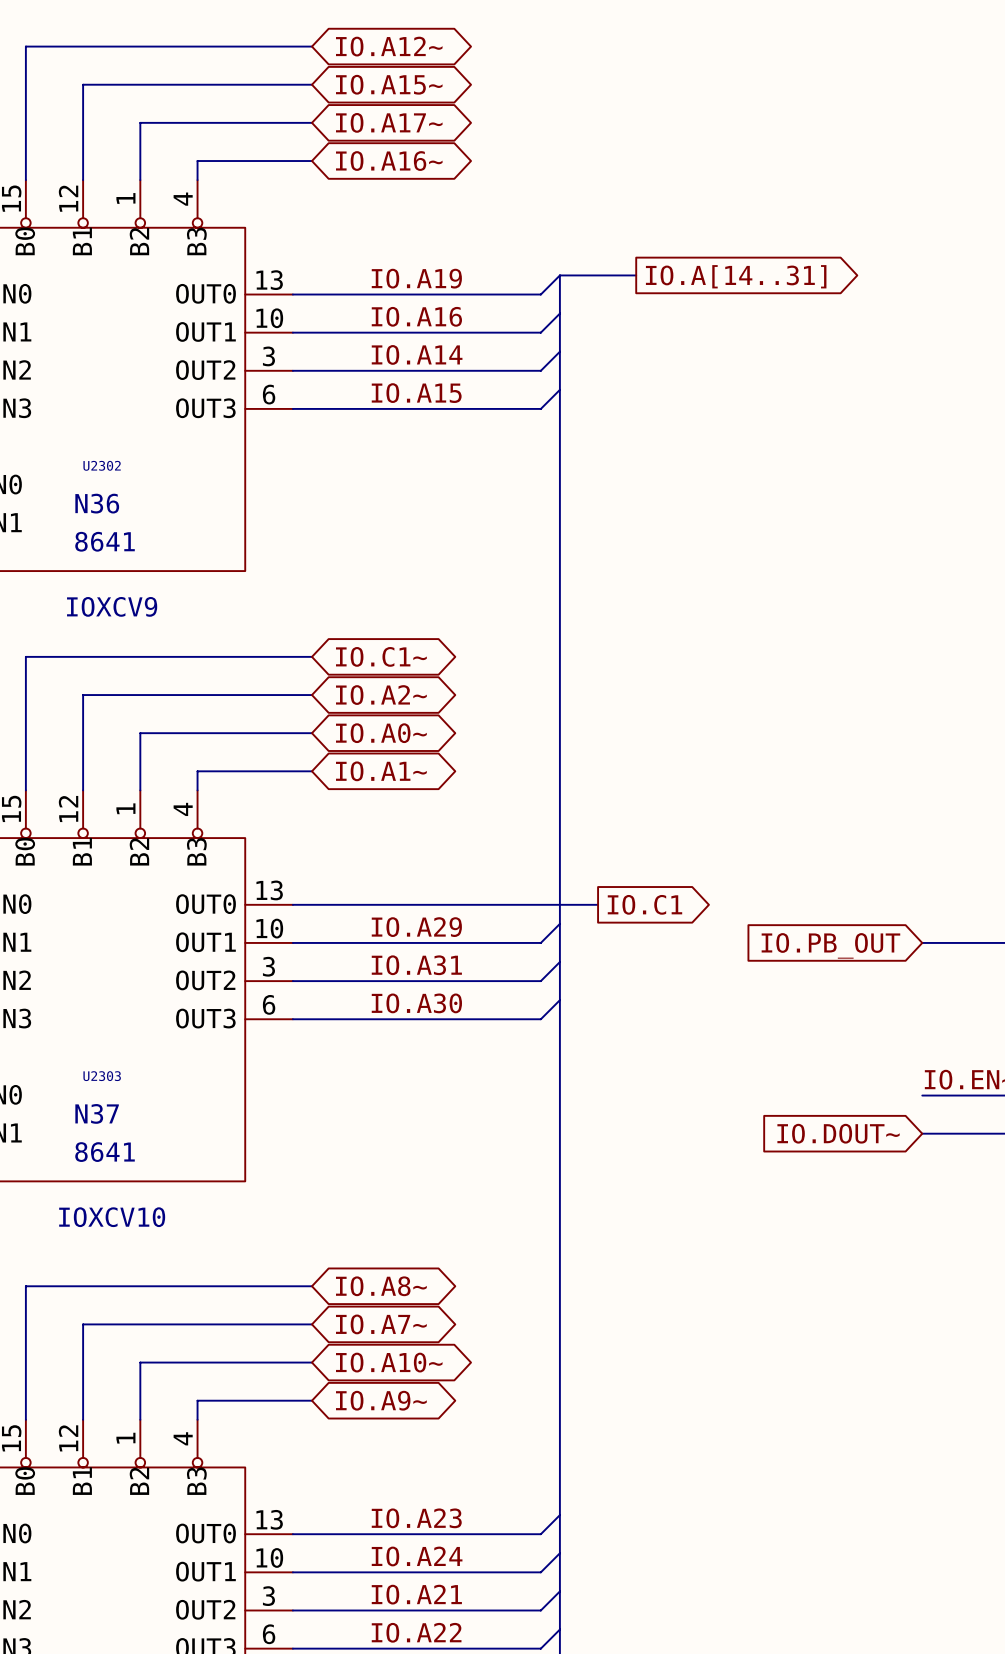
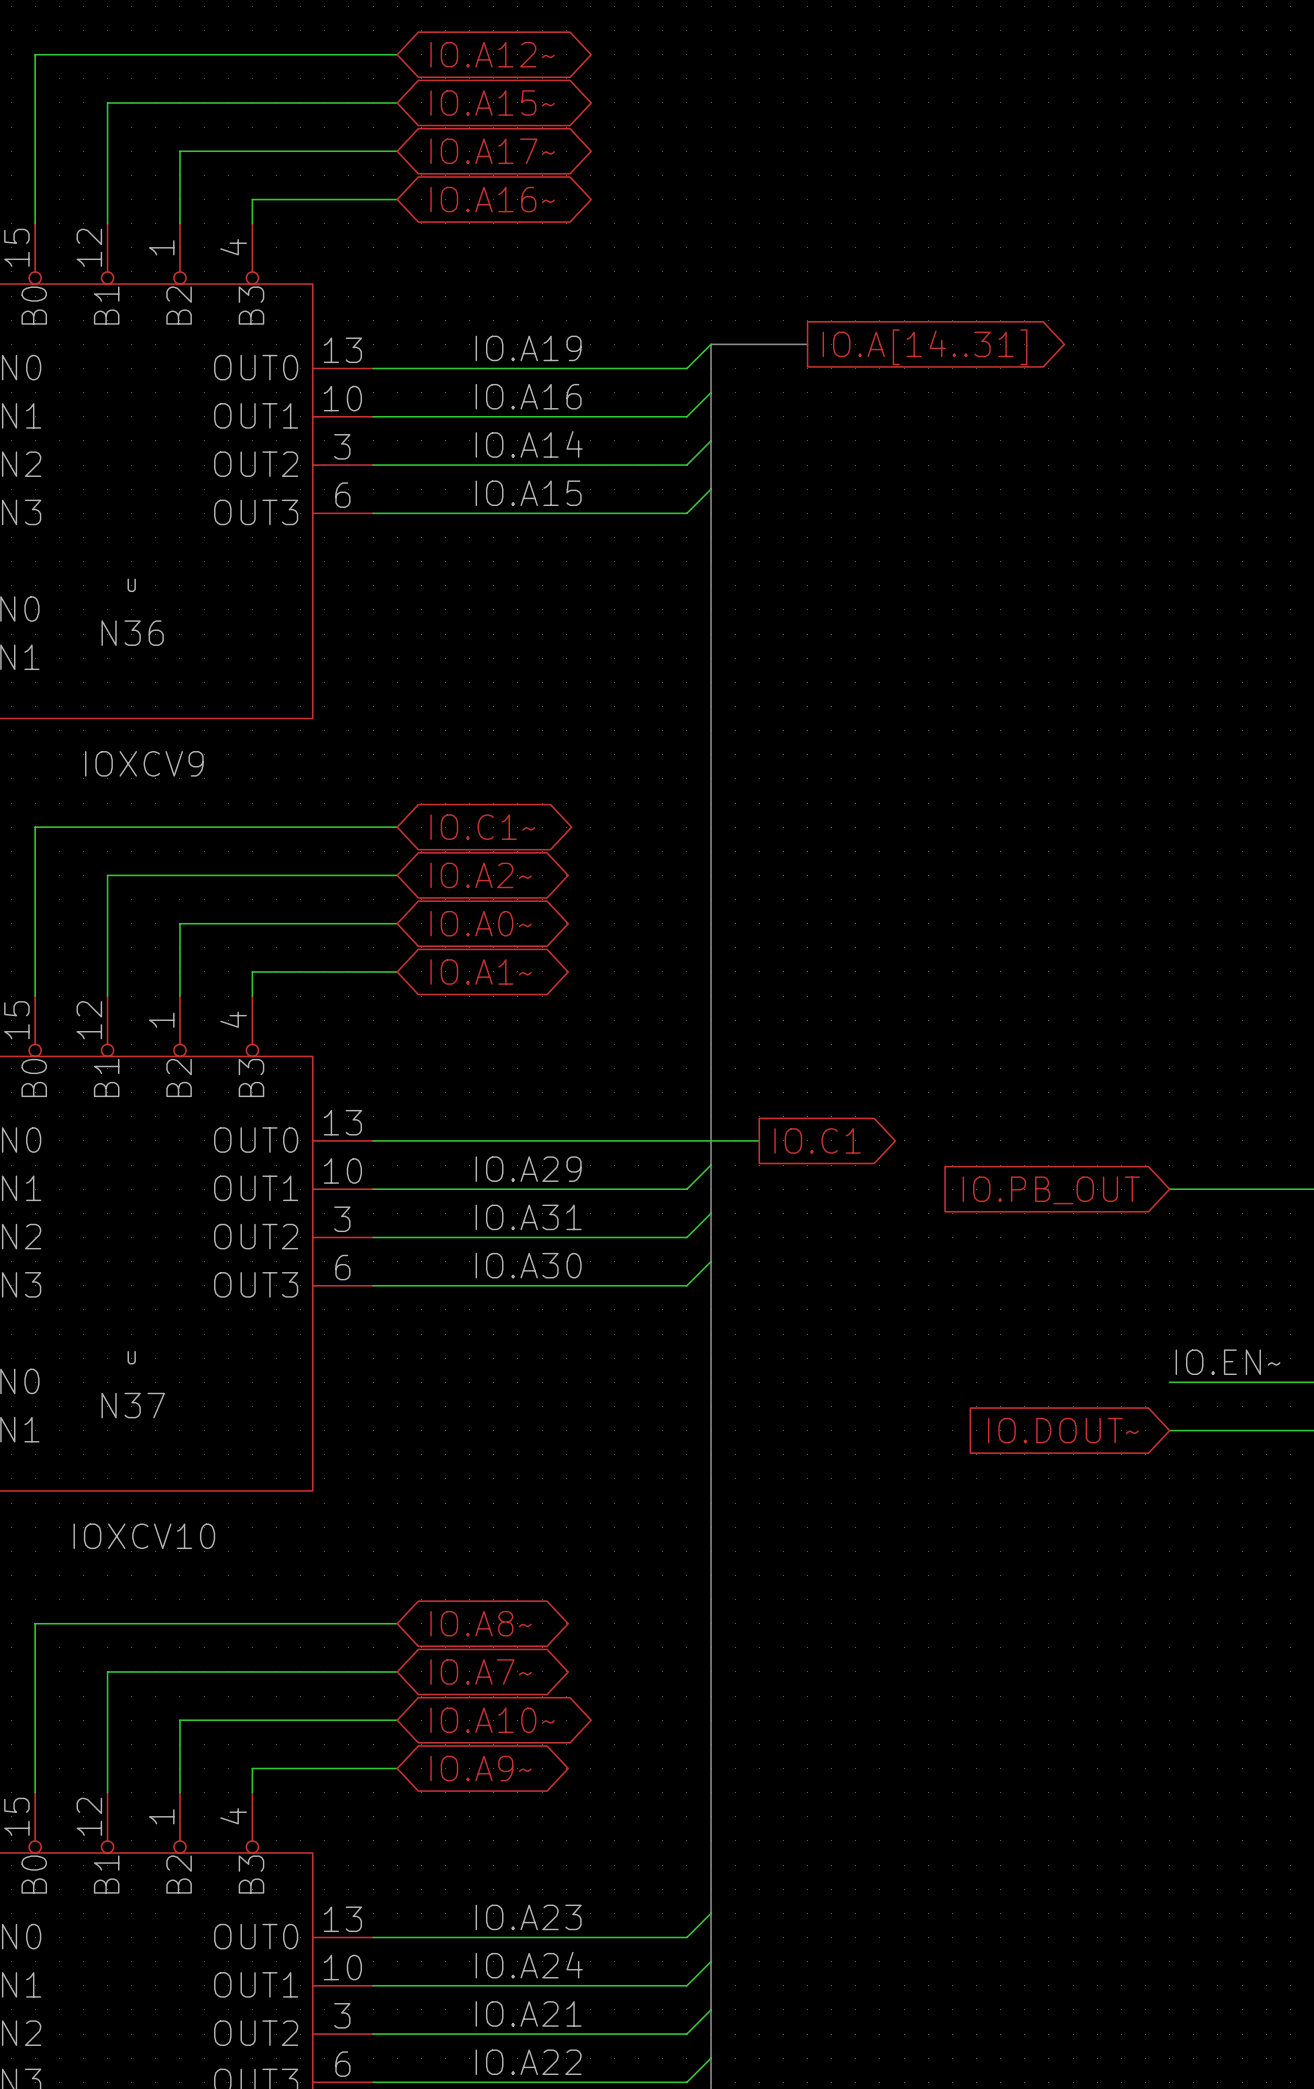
U2302 name: U2302 (102, 465) -> U (131, 585)
U2302 value: 8641 (105, 541) -> none
U2303 name: U2303 (102, 1076) -> U (131, 1357)
U2303 value: 8641 (105, 1152) -> none

